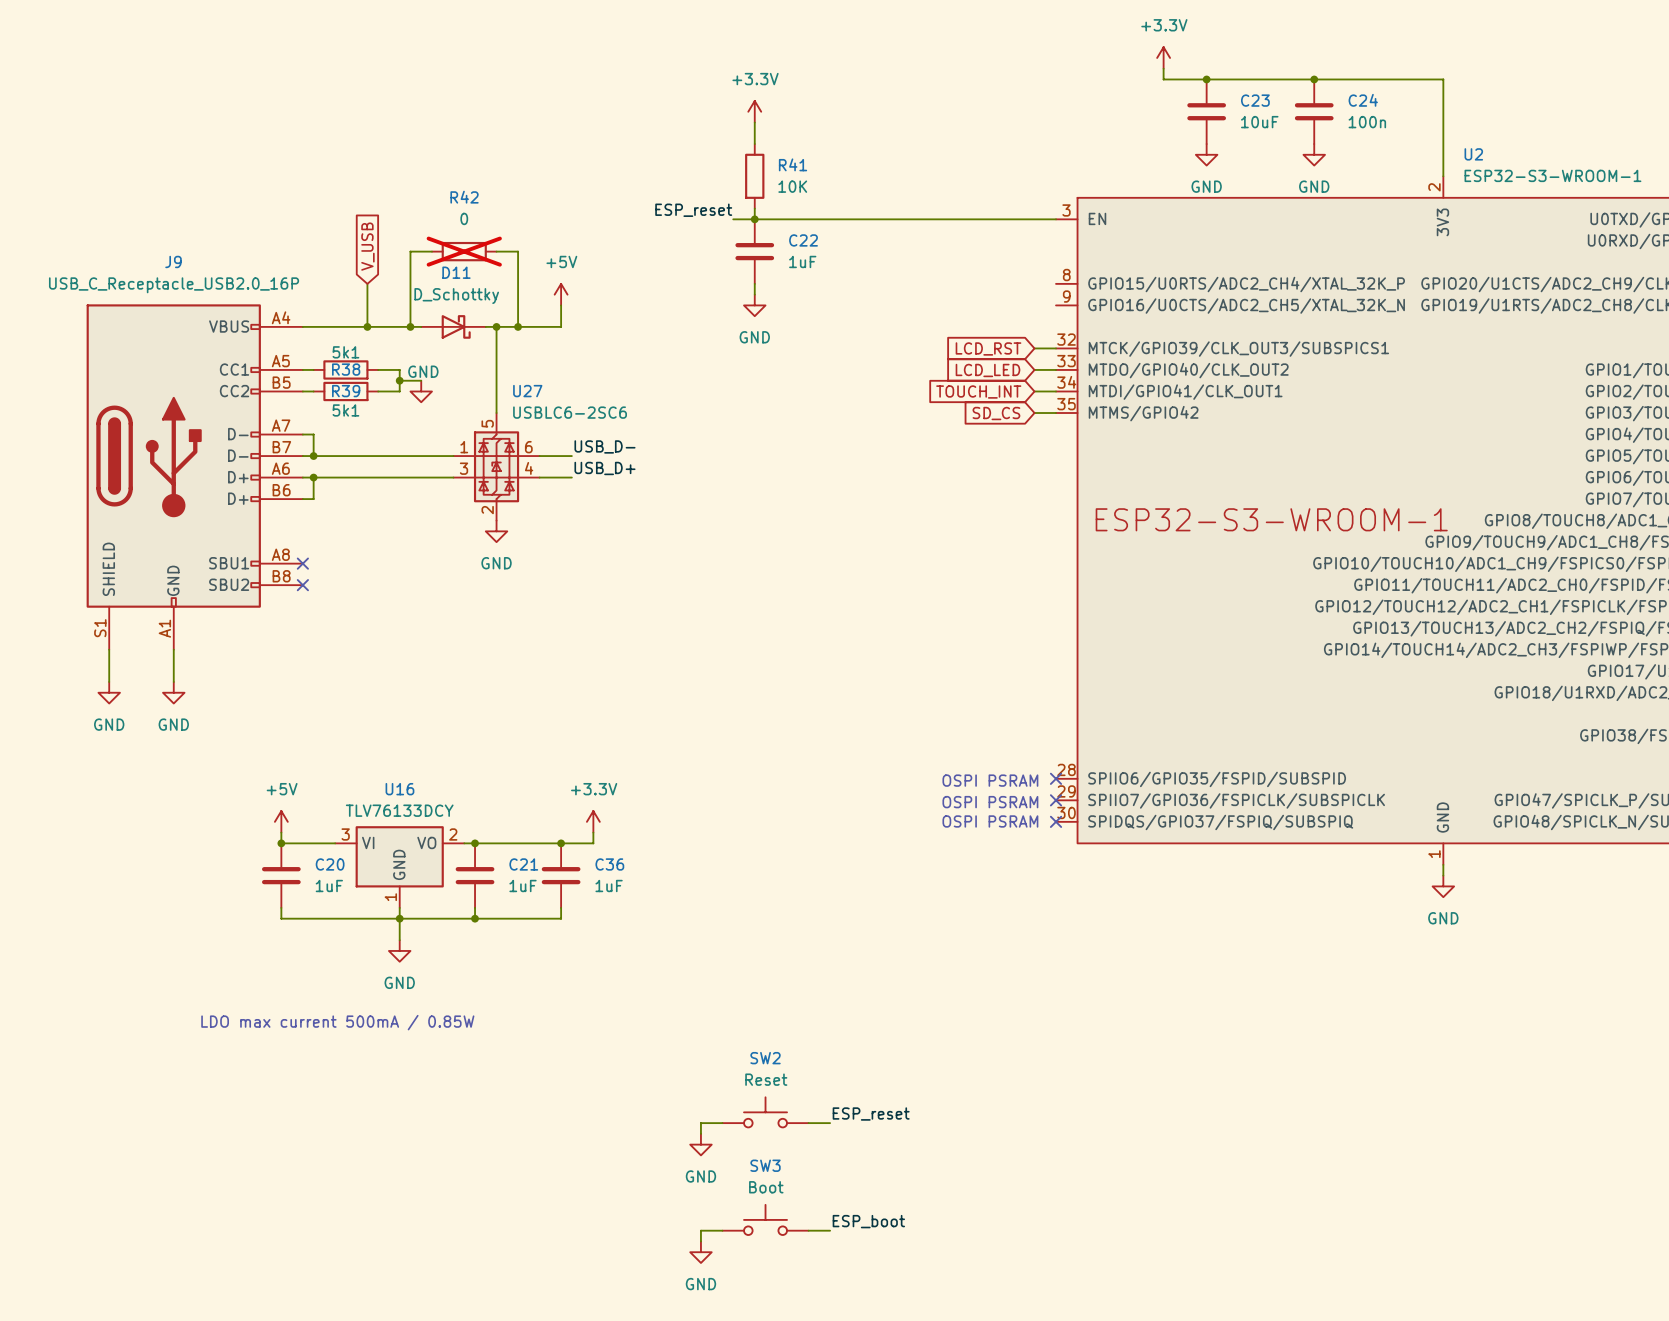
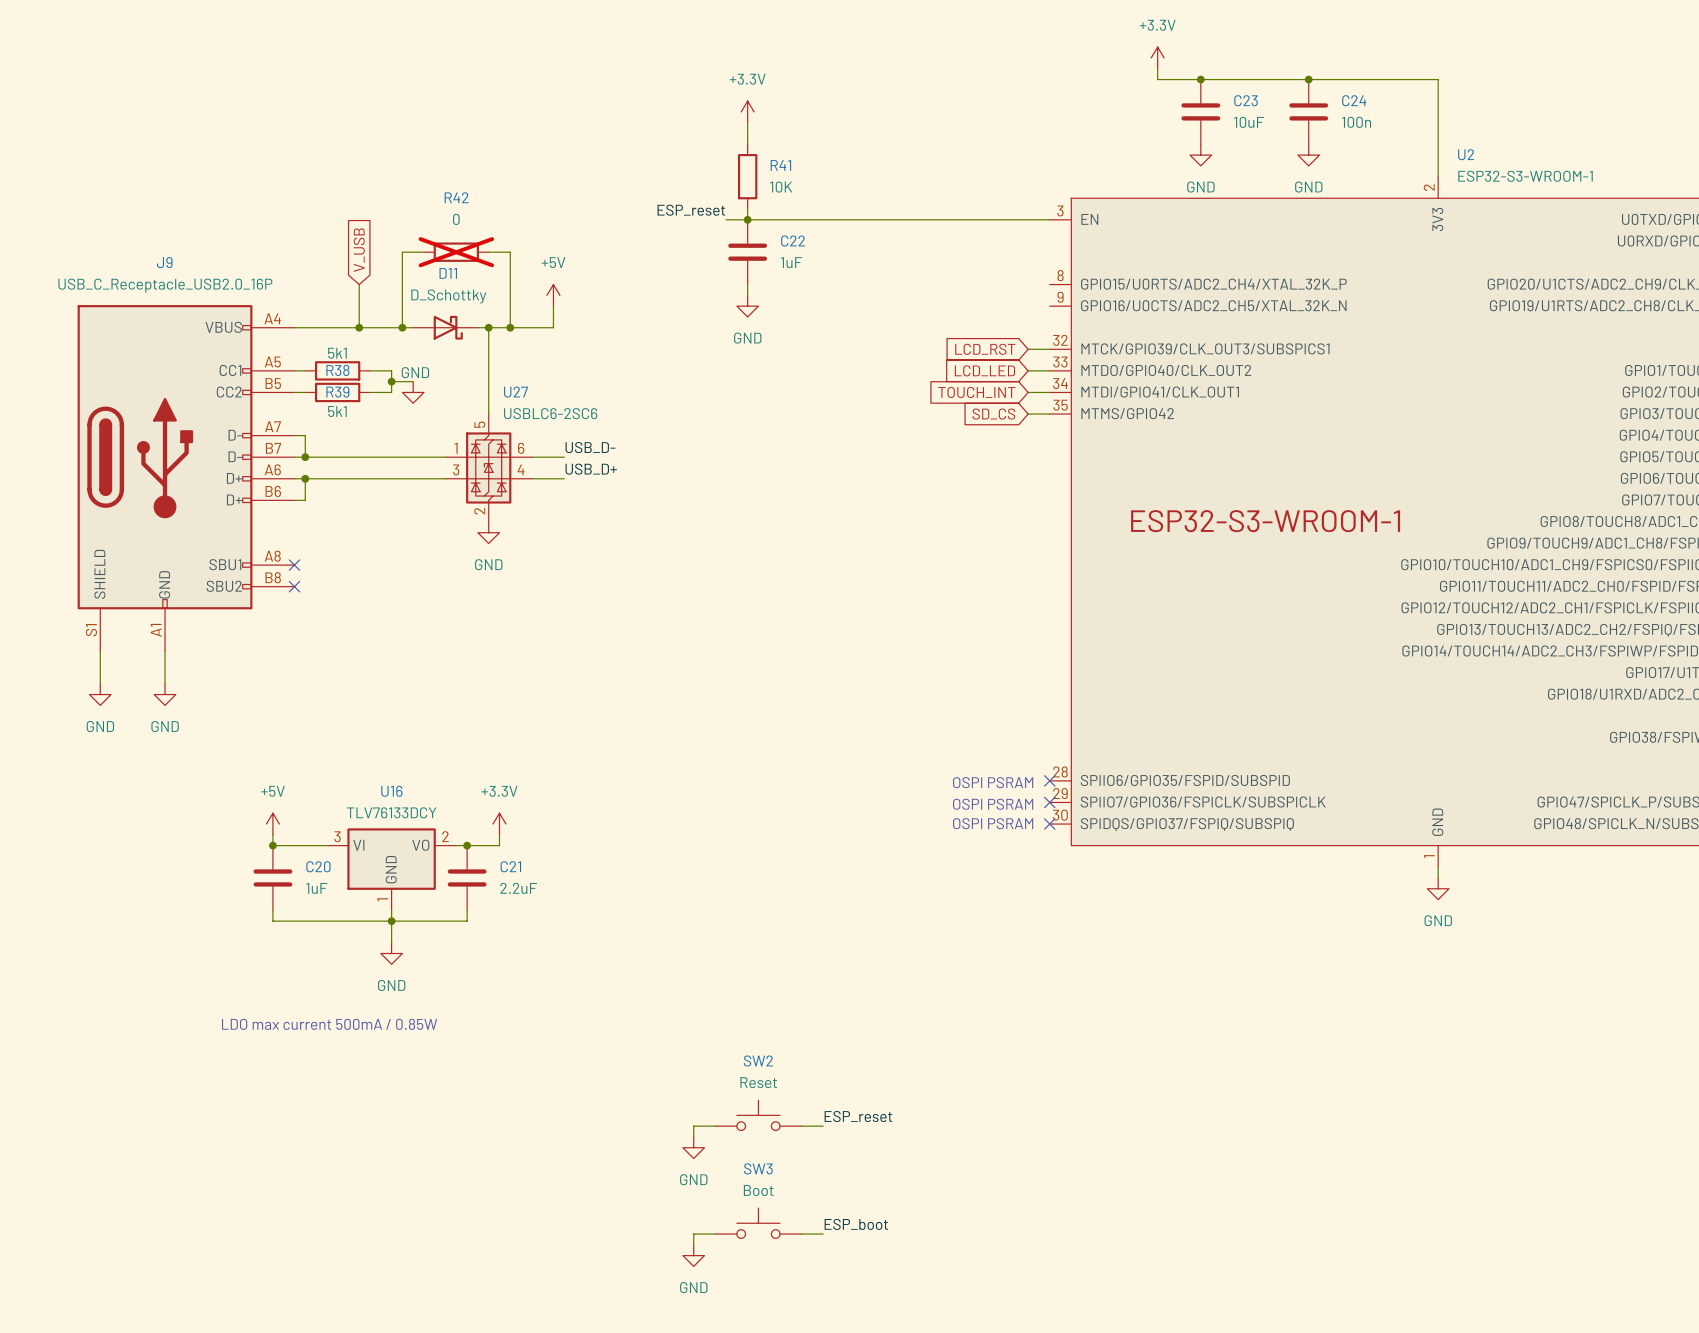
power symbol position: +3.3V (593, 821) -> +3.3V (499, 824)
wire: (593, 832) (593, 843) (507, 843) -> (499, 834) (499, 845)
junction: (561, 843) -> none
C36: 1uF (561, 875) -> none
C21 value: 1uF (523, 886) -> 2.2uF (518, 888)
wire: (561, 907) (561, 918) (475, 918) -> none
junction: (475, 918) -> none

